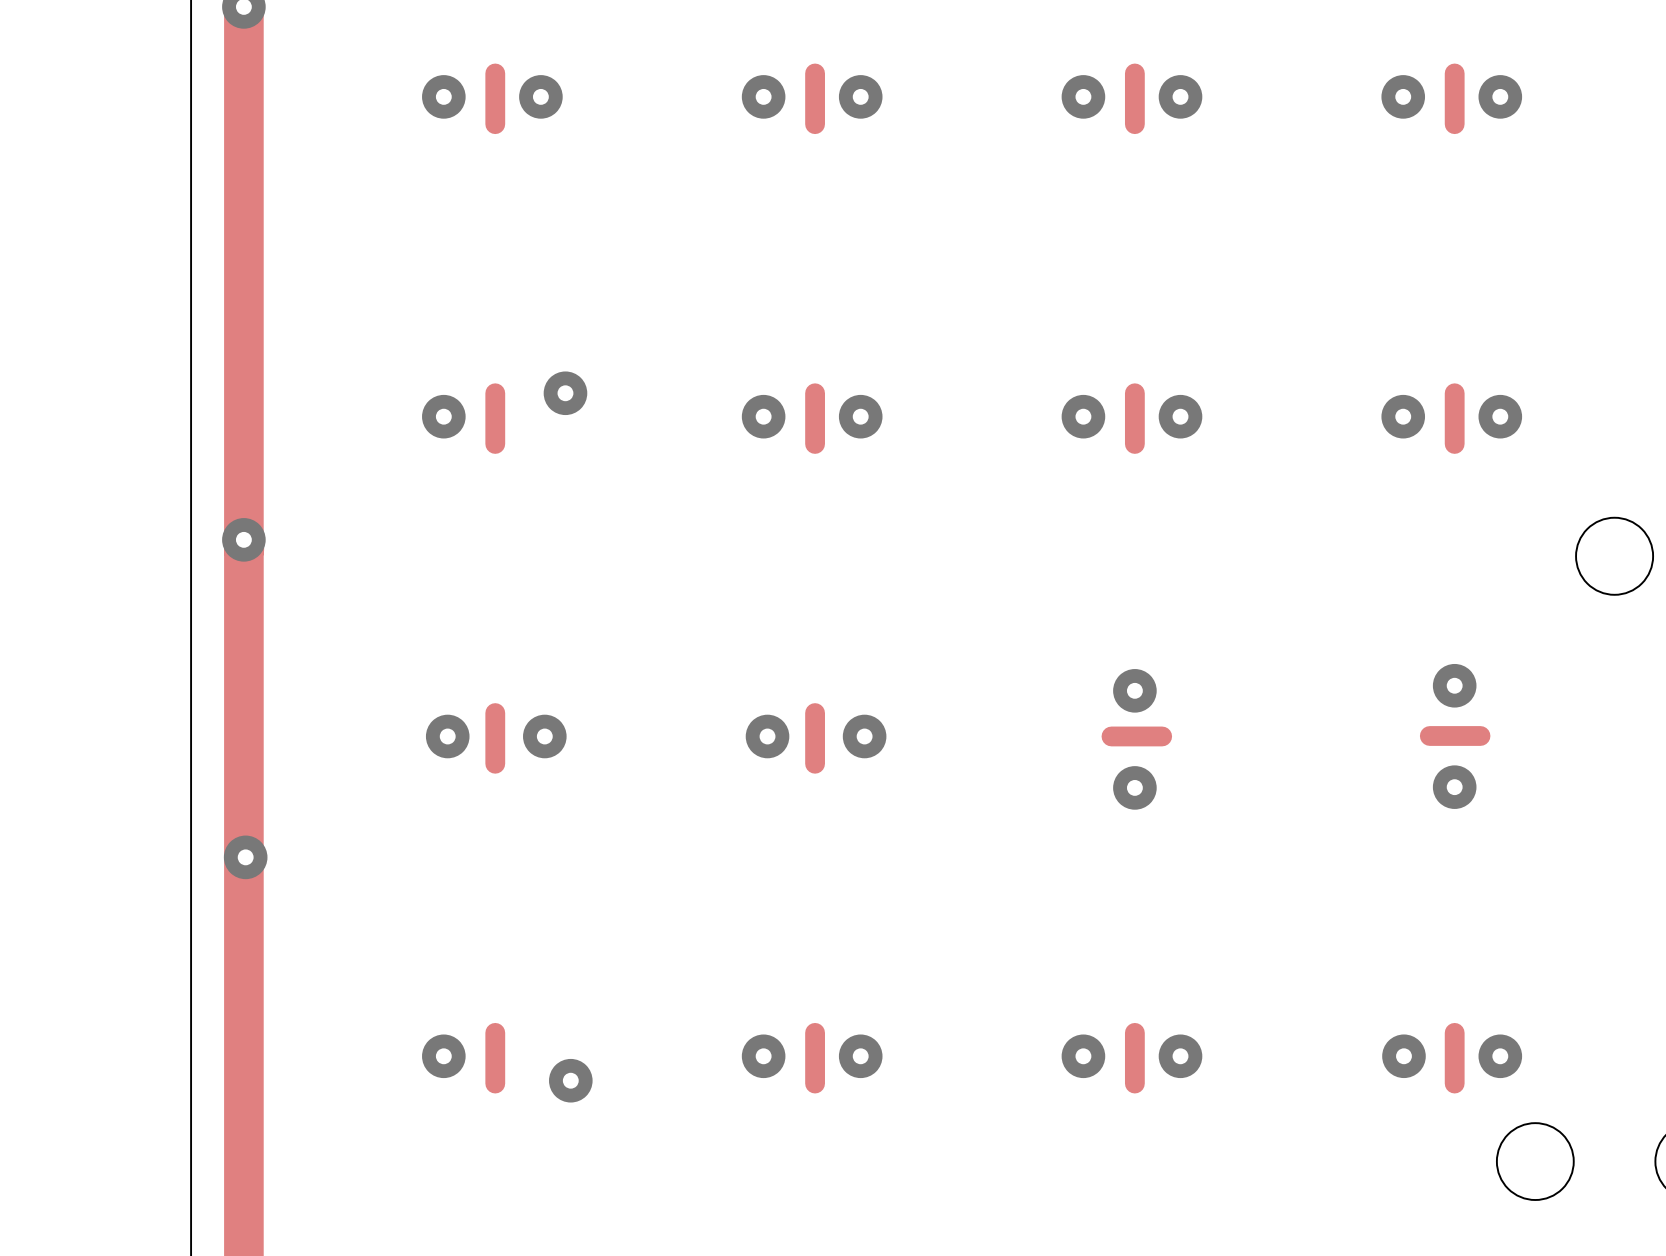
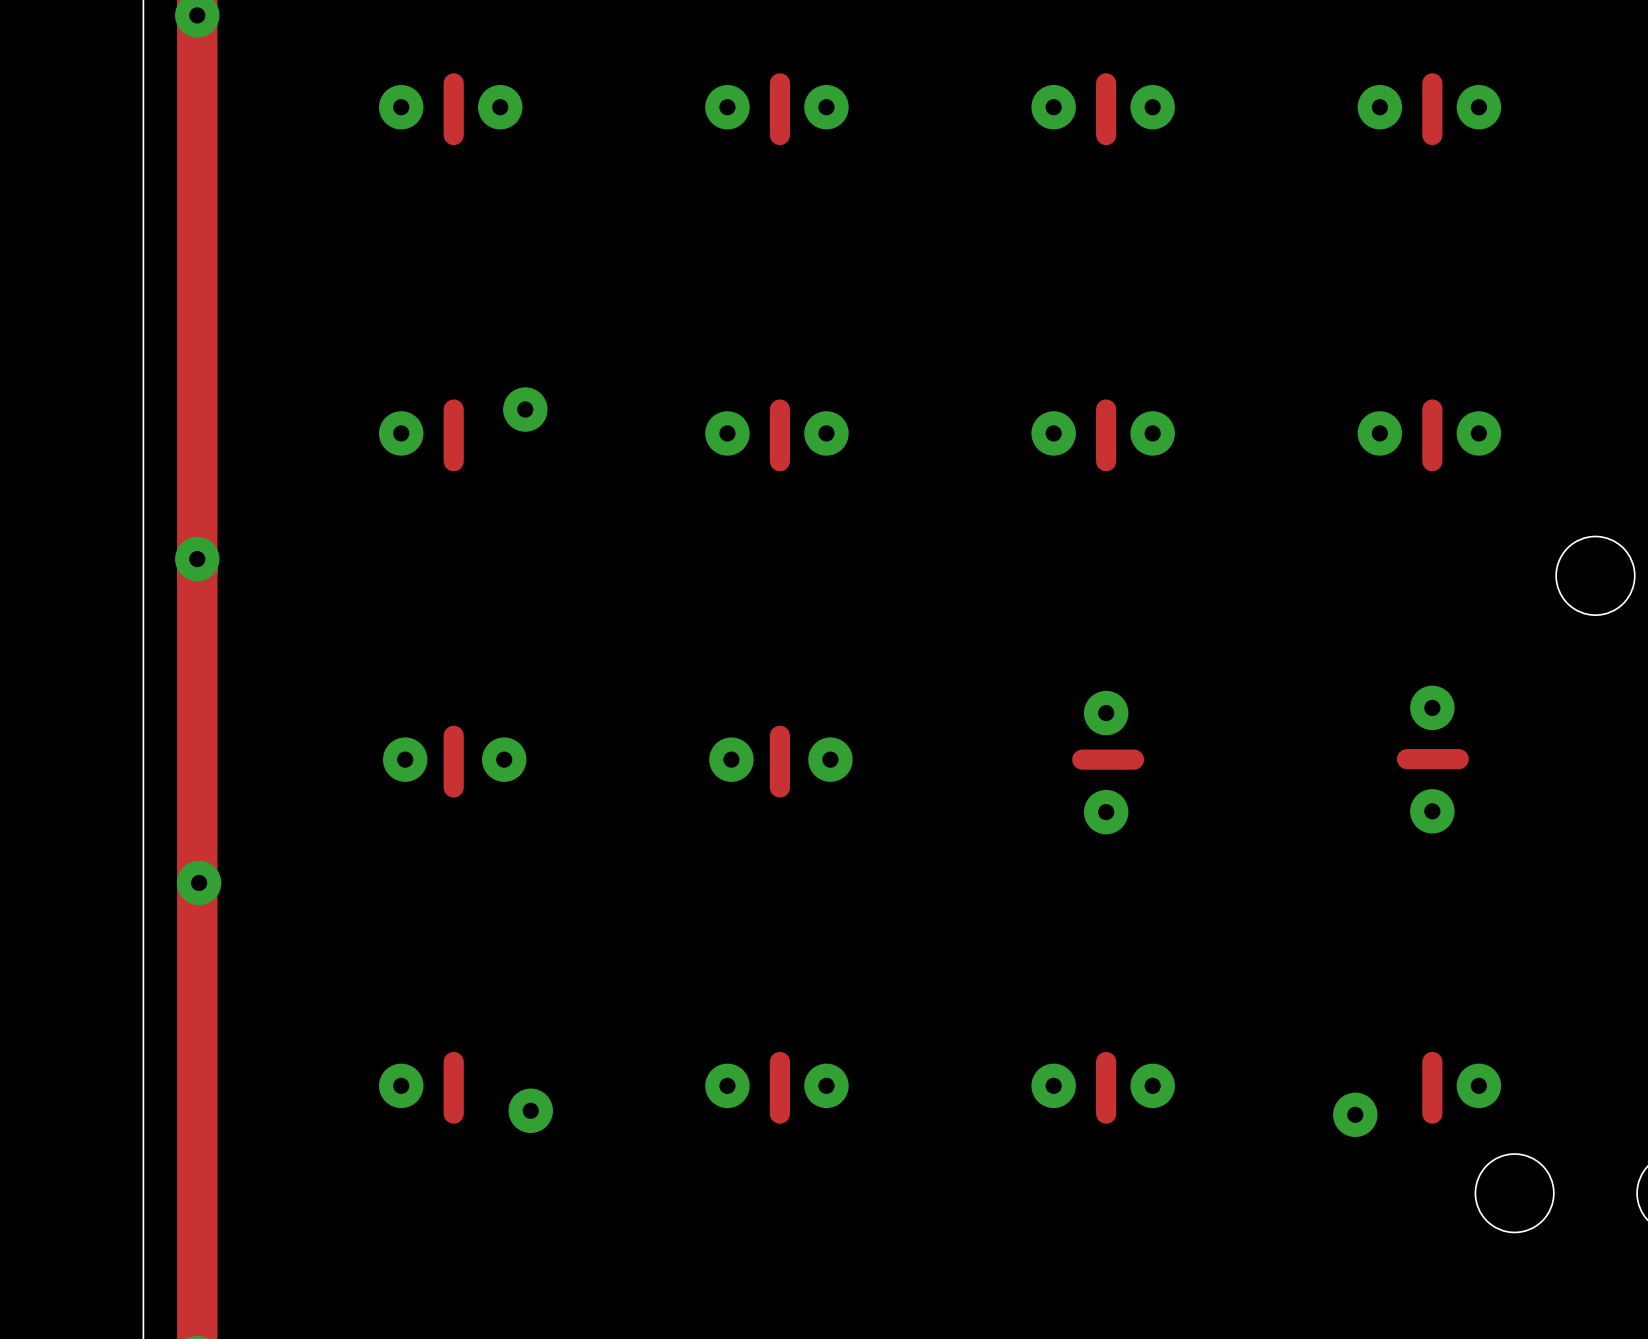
via position: (1403, 1056) -> (1355, 1114)

